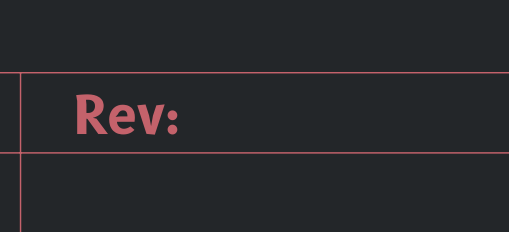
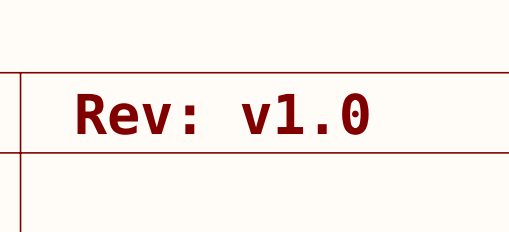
title block: Rev: (126, 114) -> Rev: v1.0 (223, 114)

